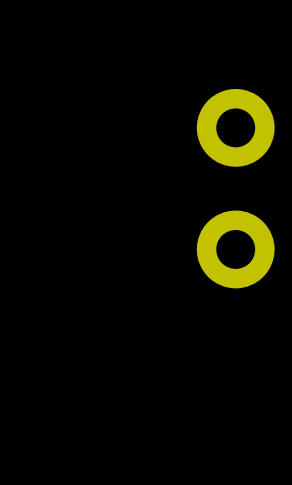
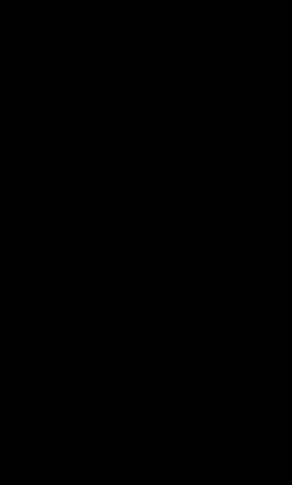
part: (235, 188) -> none

